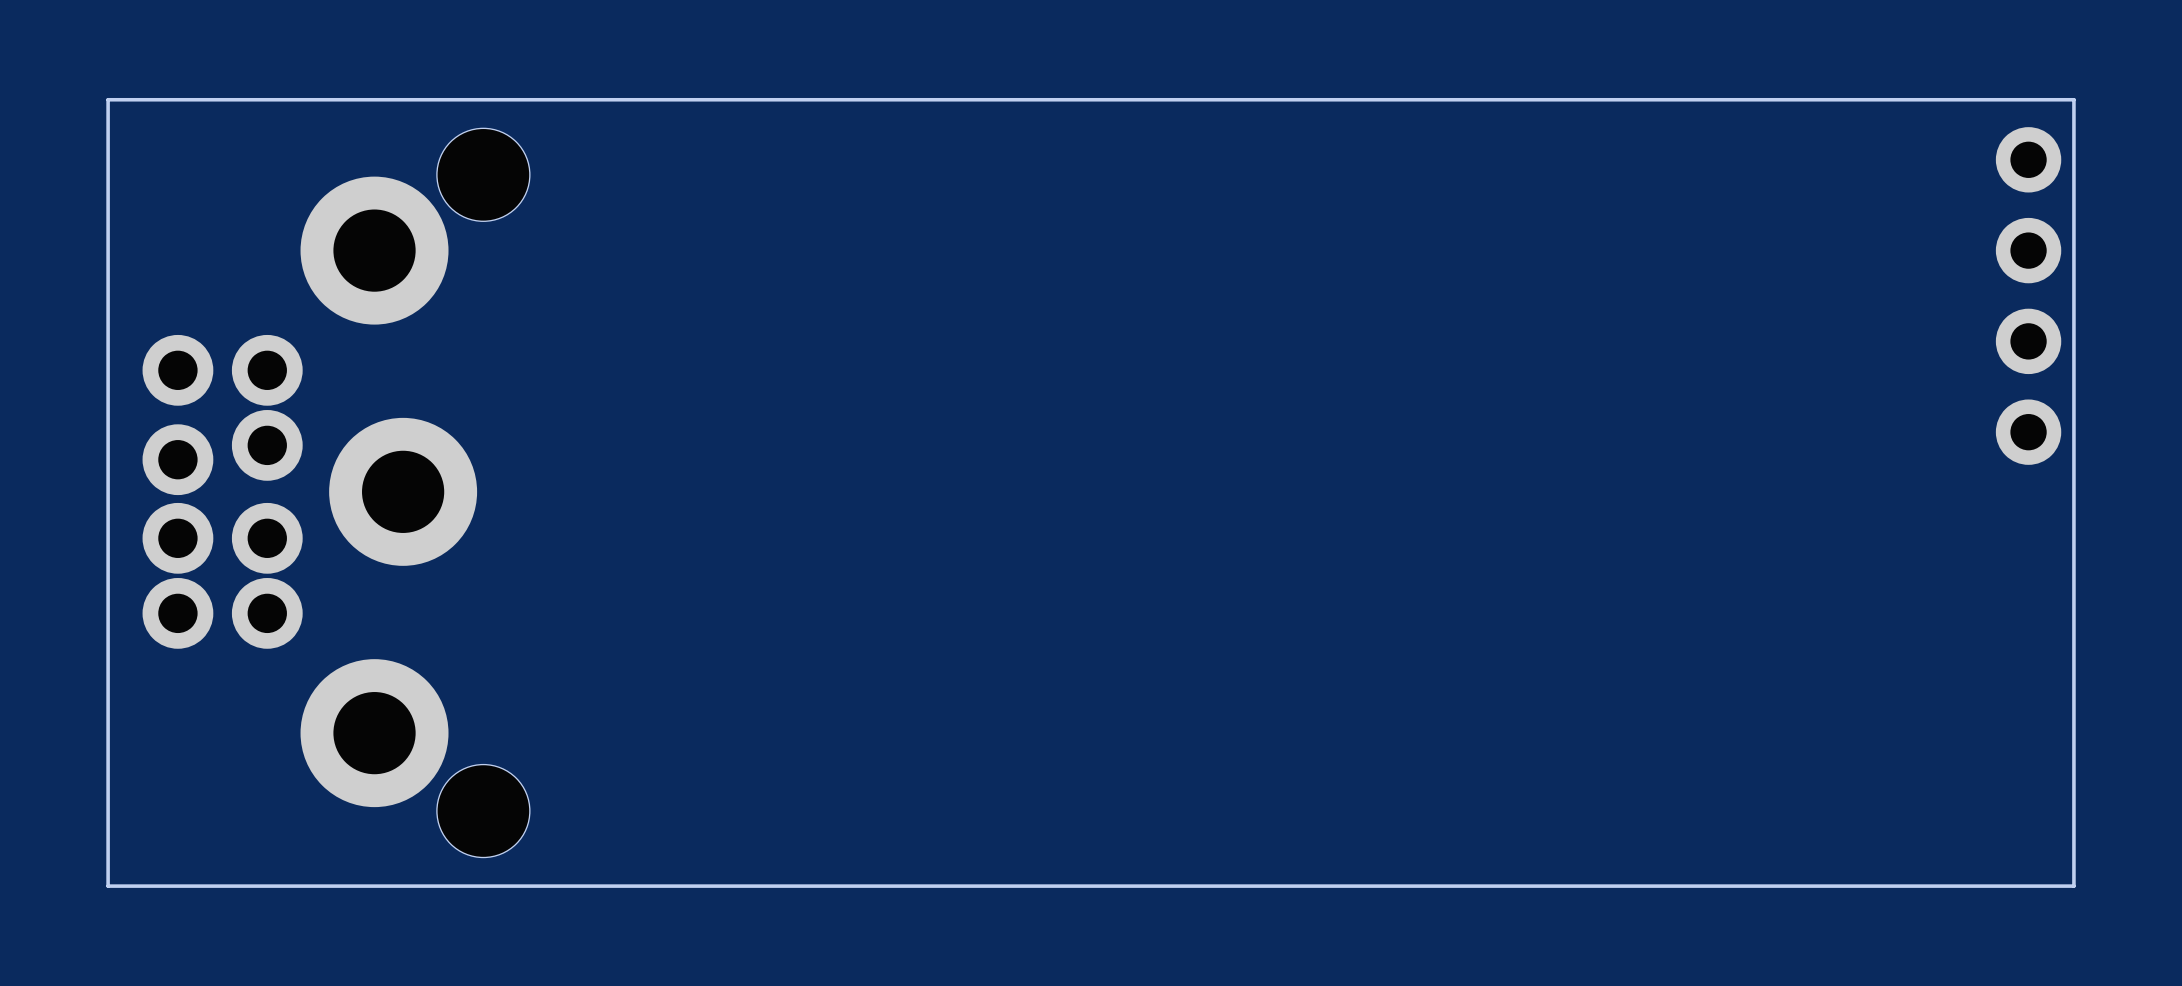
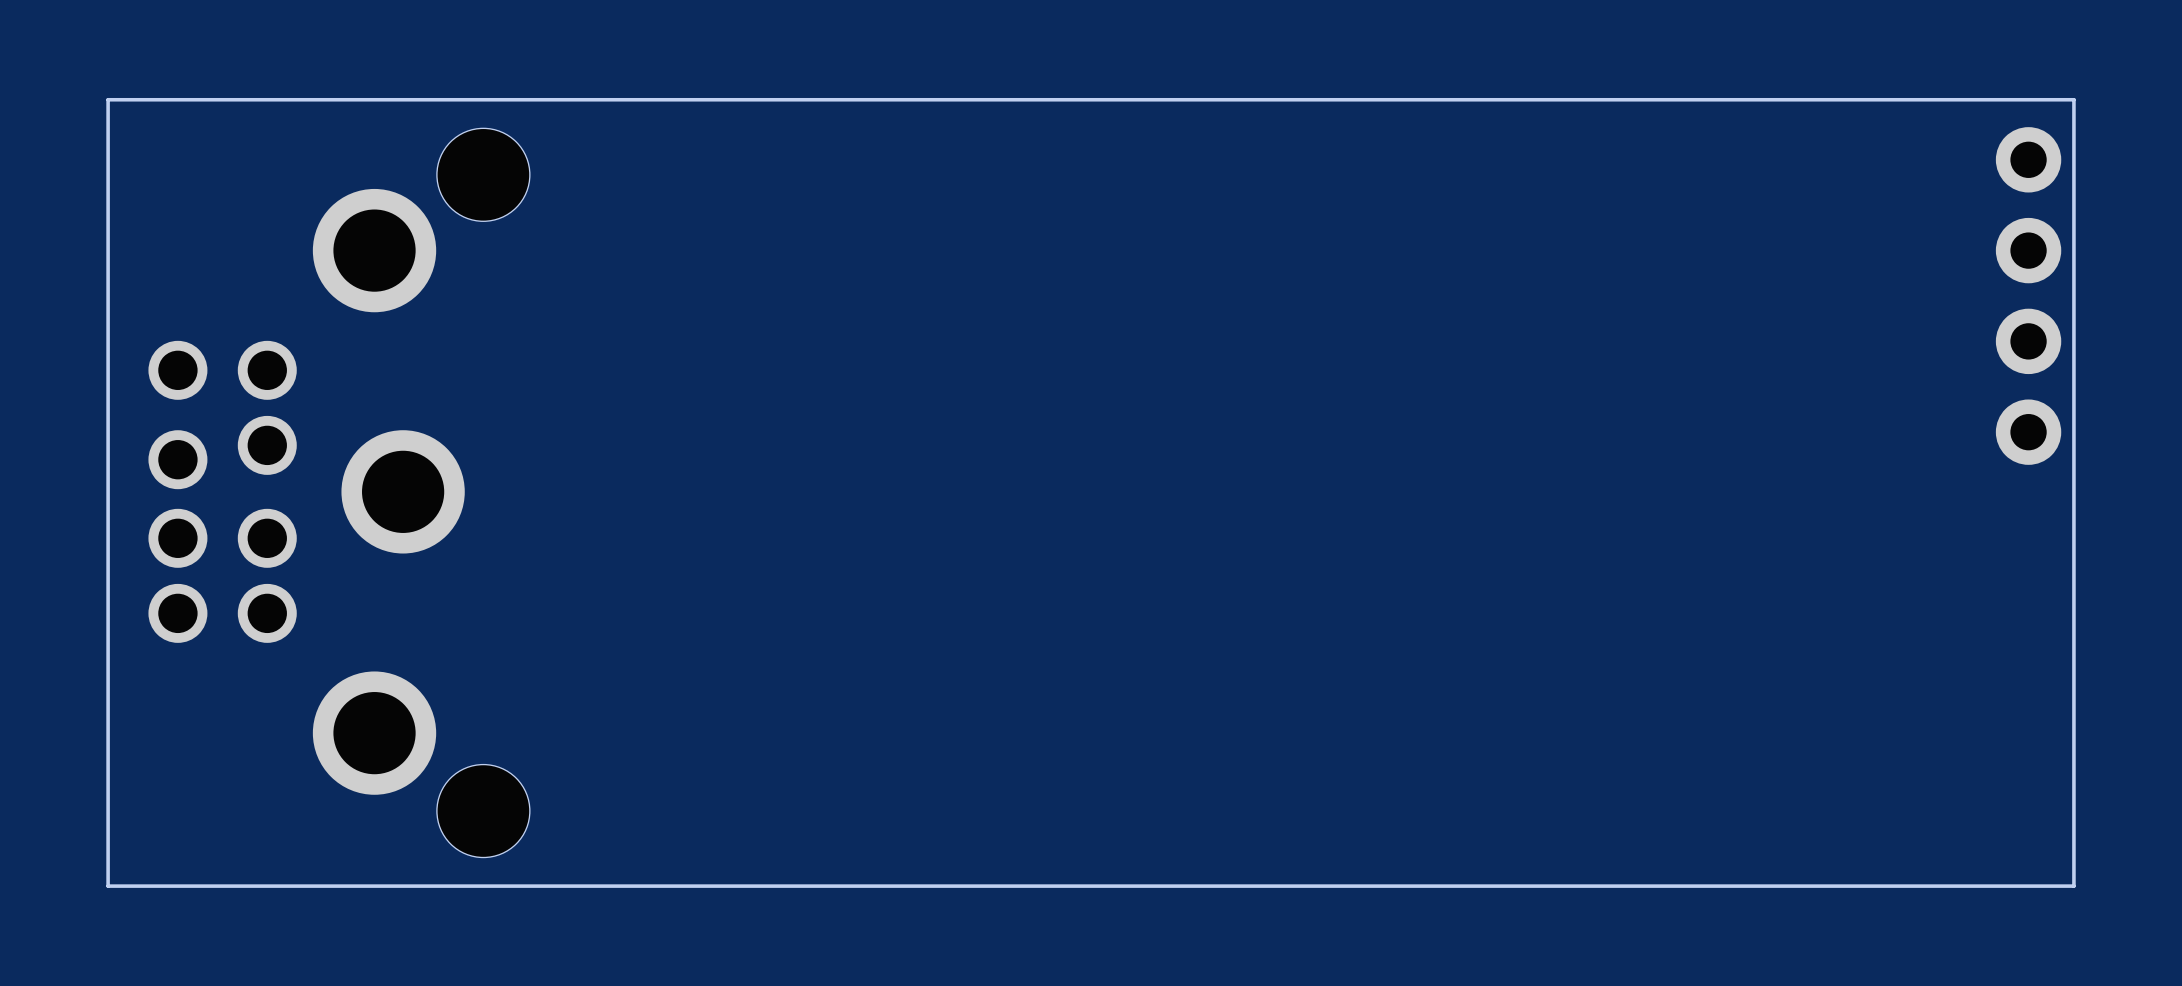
part footprint: [142, 176, 478, 808] -> [148, 188, 465, 795]

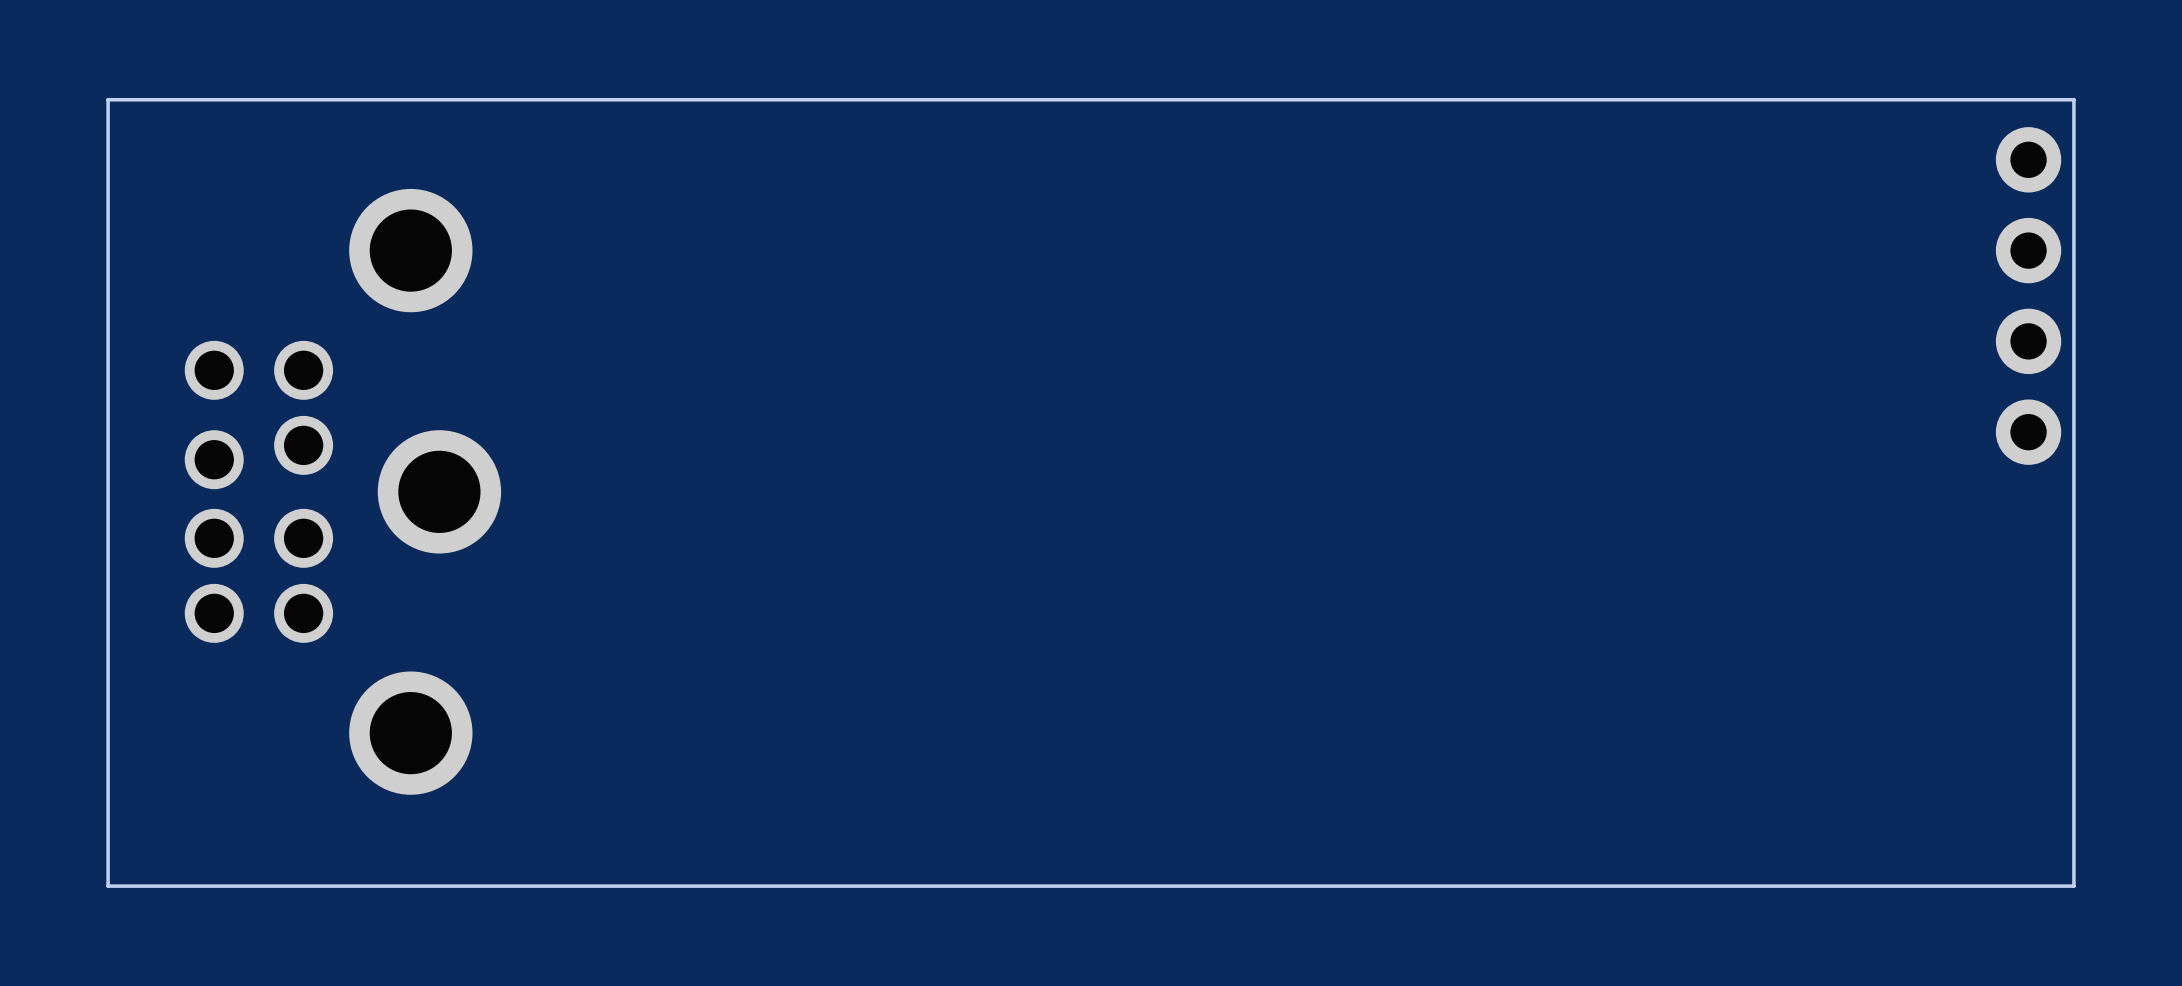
hole: (483, 174) -> none
part position: (306, 491) -> (342, 491)
hole: (483, 811) -> none

